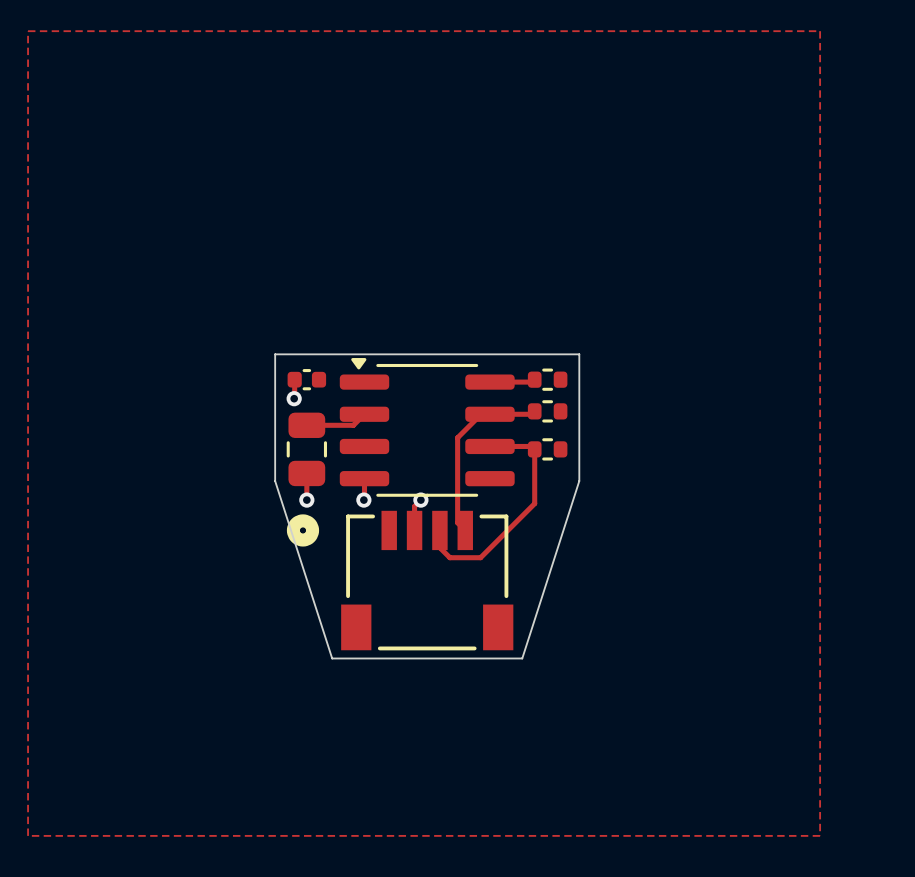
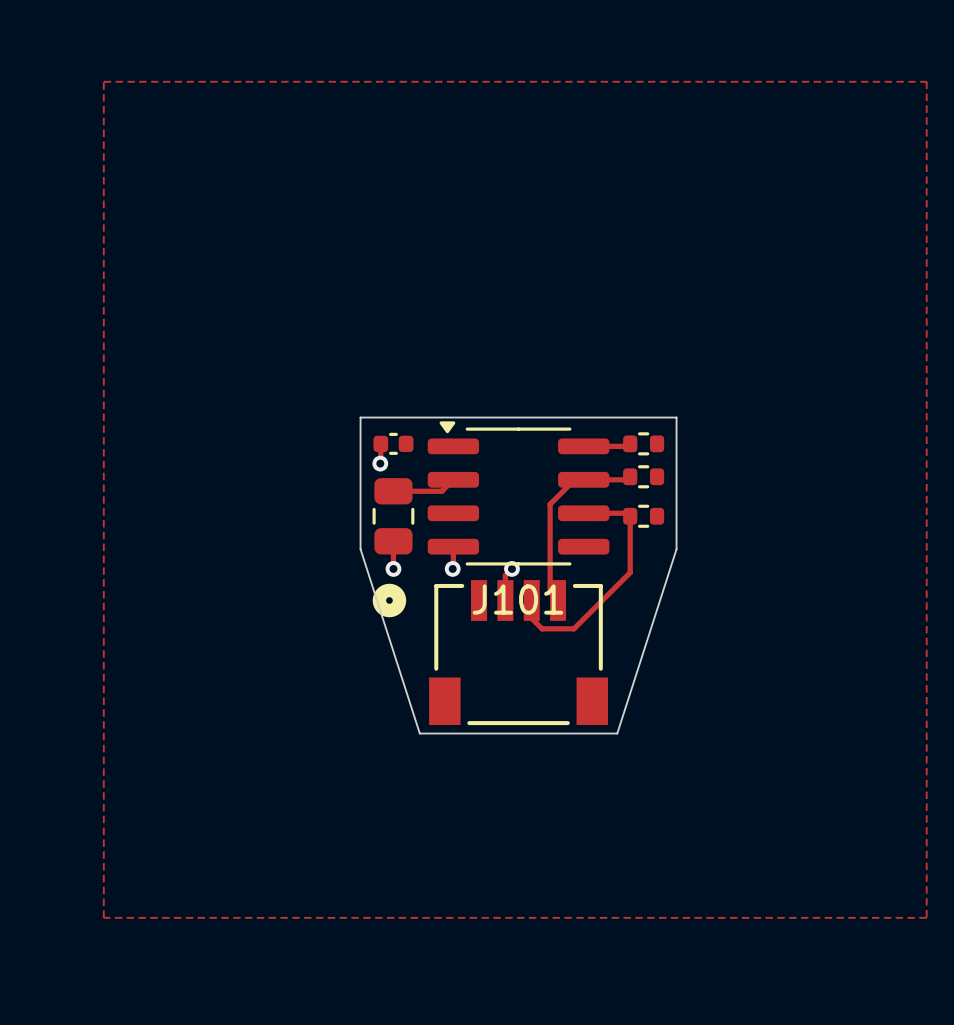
J101 name: none -> J101 (517, 599)

